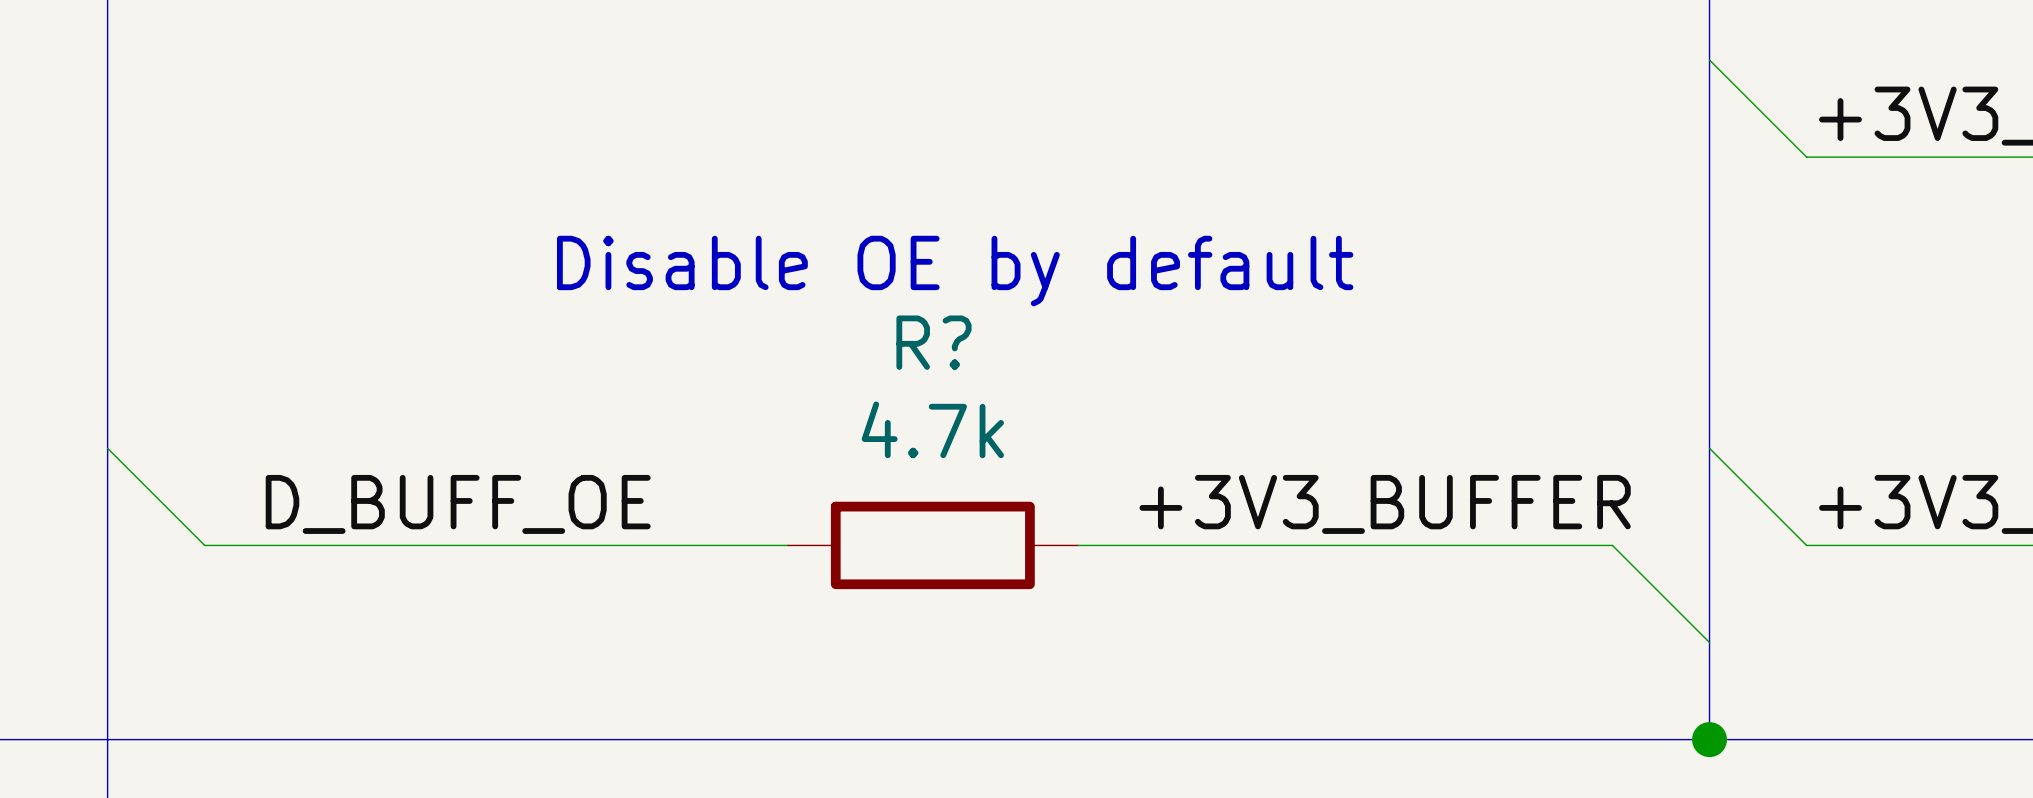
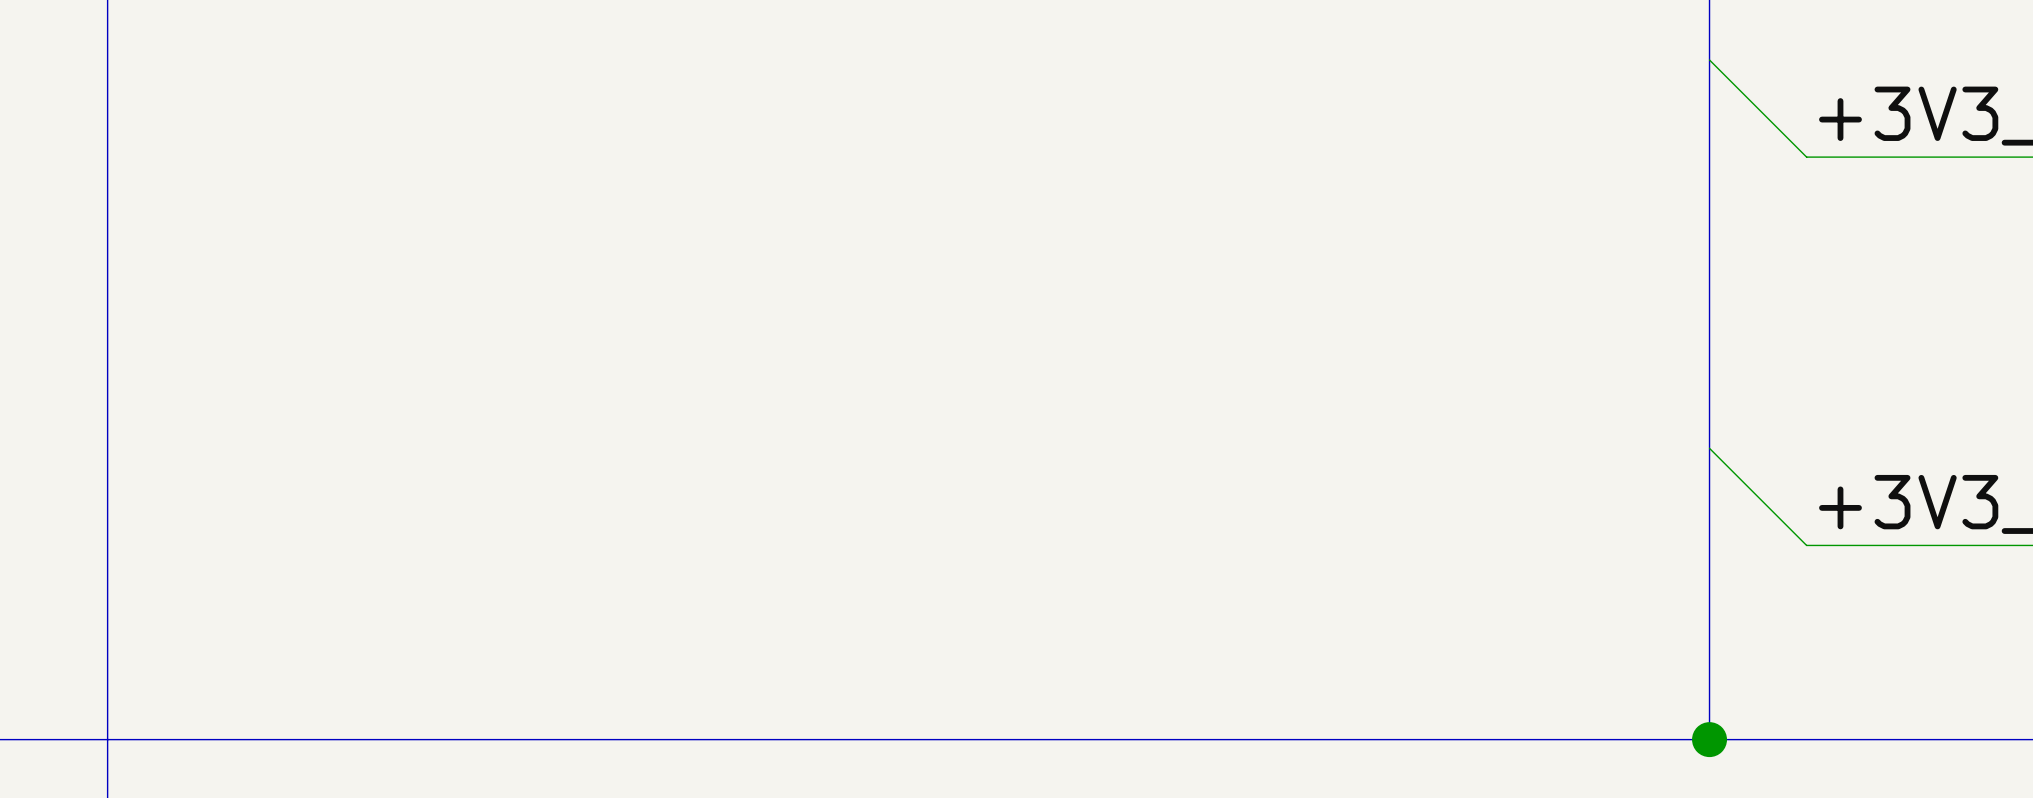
text: Disable OE by default (955, 271) -> none
wire: (107, 448) (204, 545) (787, 545) -> none
label: D_BUFF_OE (458, 504) -> none
label: +3V3_BUFFER (1385, 504) -> none
R?: 4.7k (932, 545) -> none
wire: (1078, 545) (1612, 545) (1709, 642) -> none

